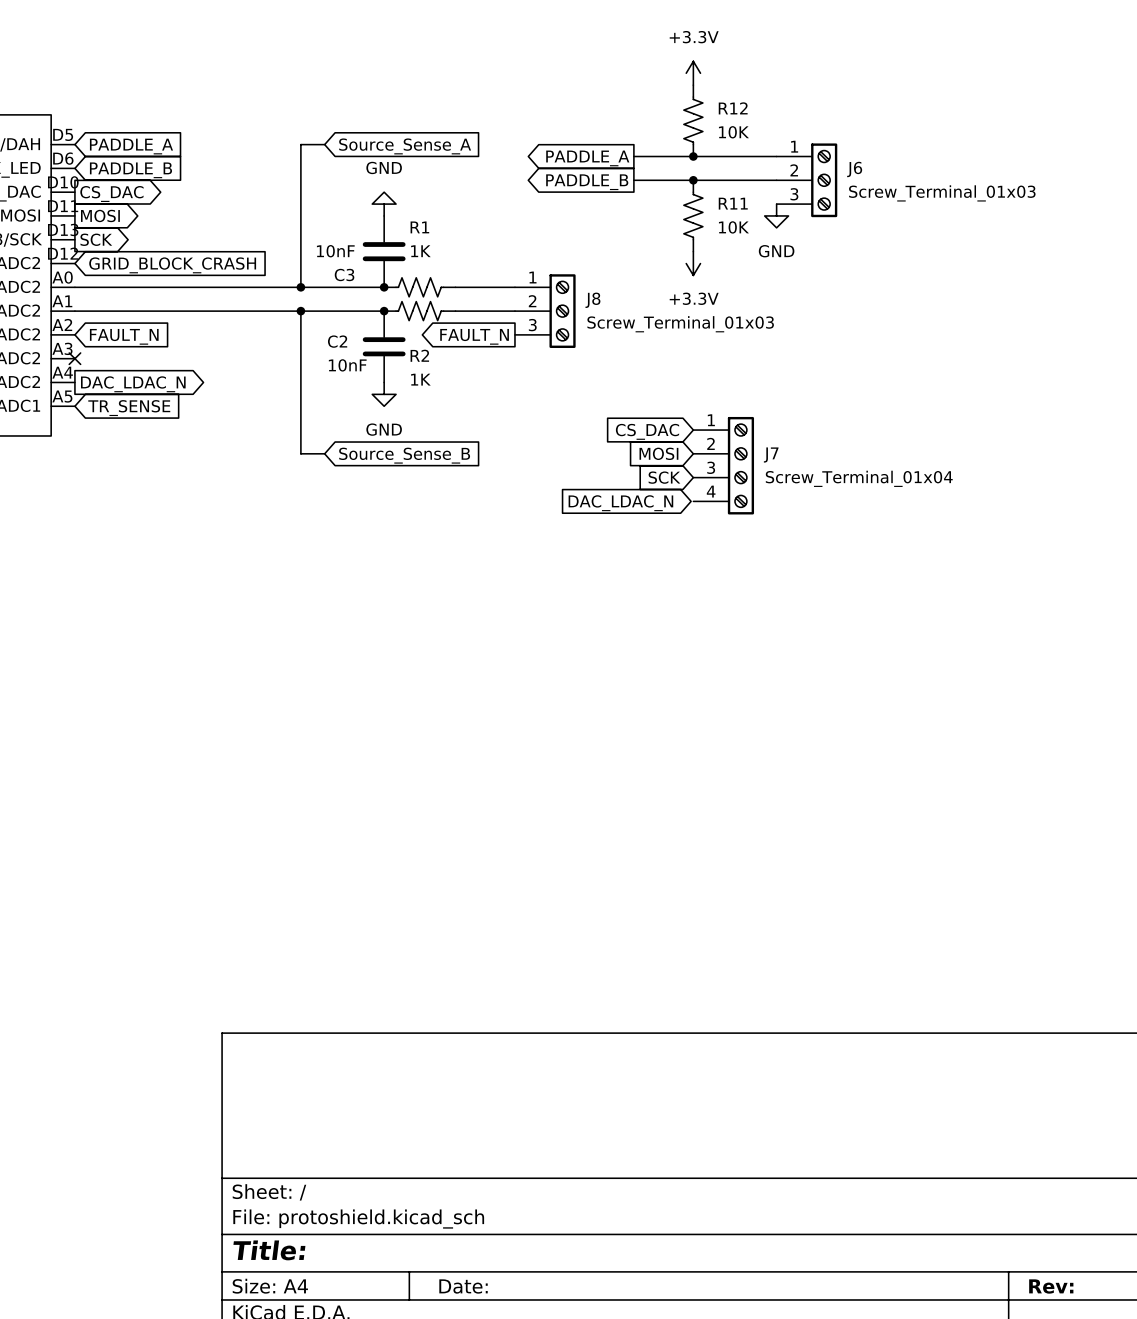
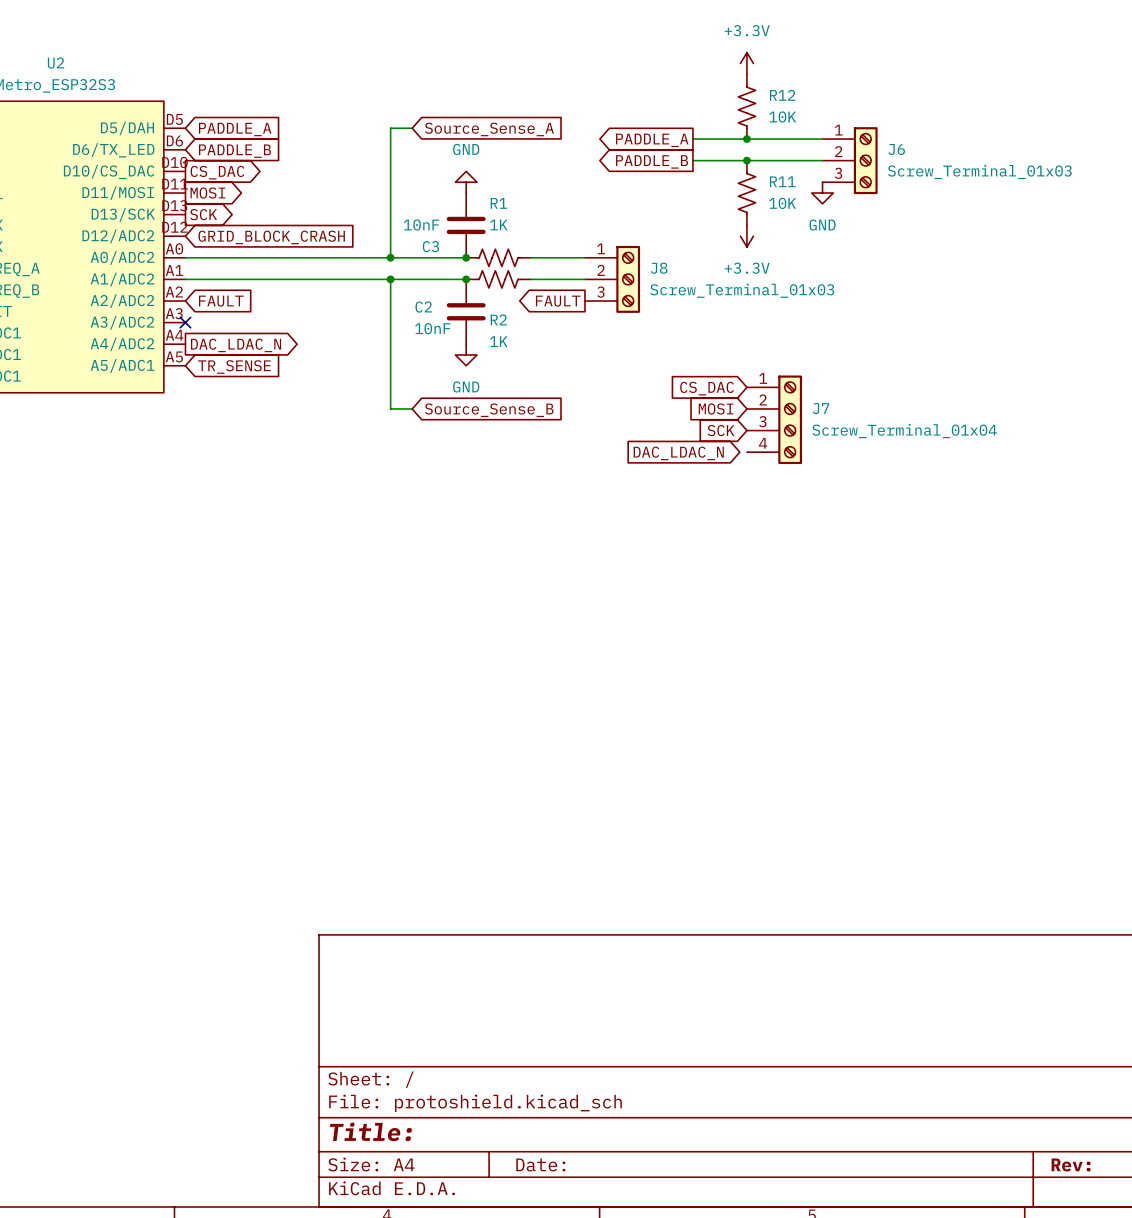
global label: FAULT_N (124, 336) -> FAULT (221, 301)
global label: FAULT_N (474, 336) -> FAULT (558, 301)

